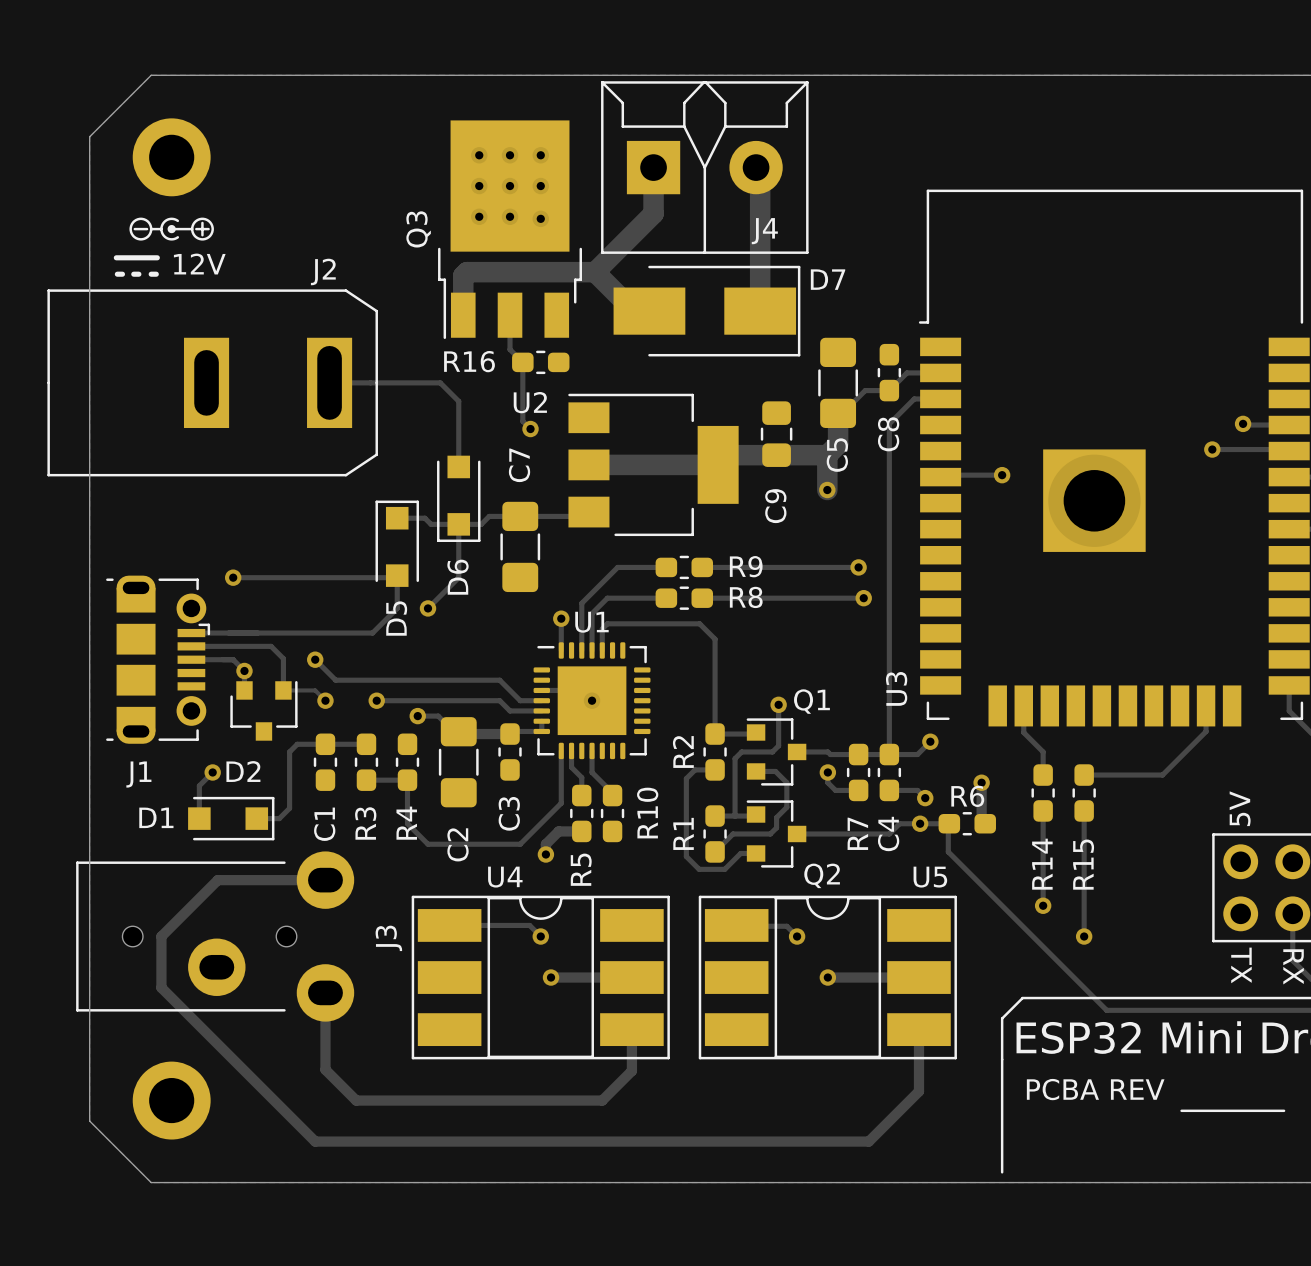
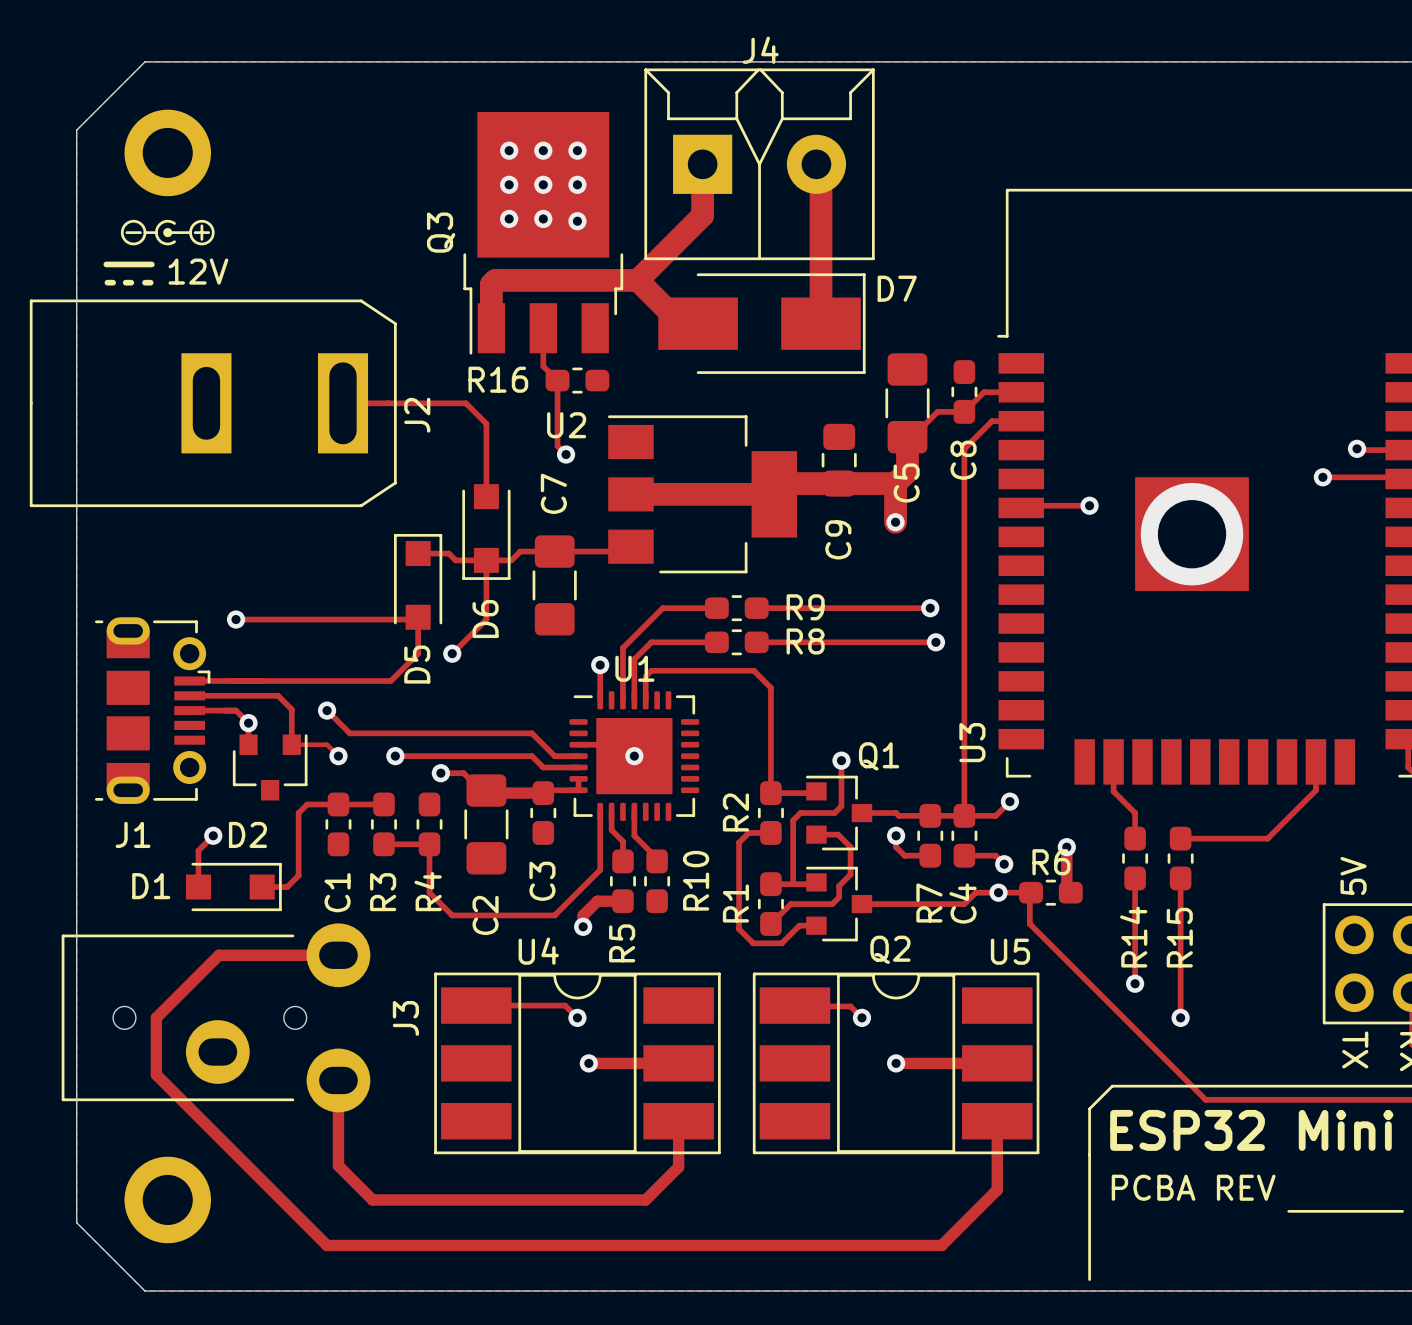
J4 name position: J4 (764, 231) -> J4 (760, 50)
J2 name rotation: 0° (323, 271) -> 90° counterclockwise (417, 415)
J2 name position: J2 (323, 271) -> J2 (417, 415)

